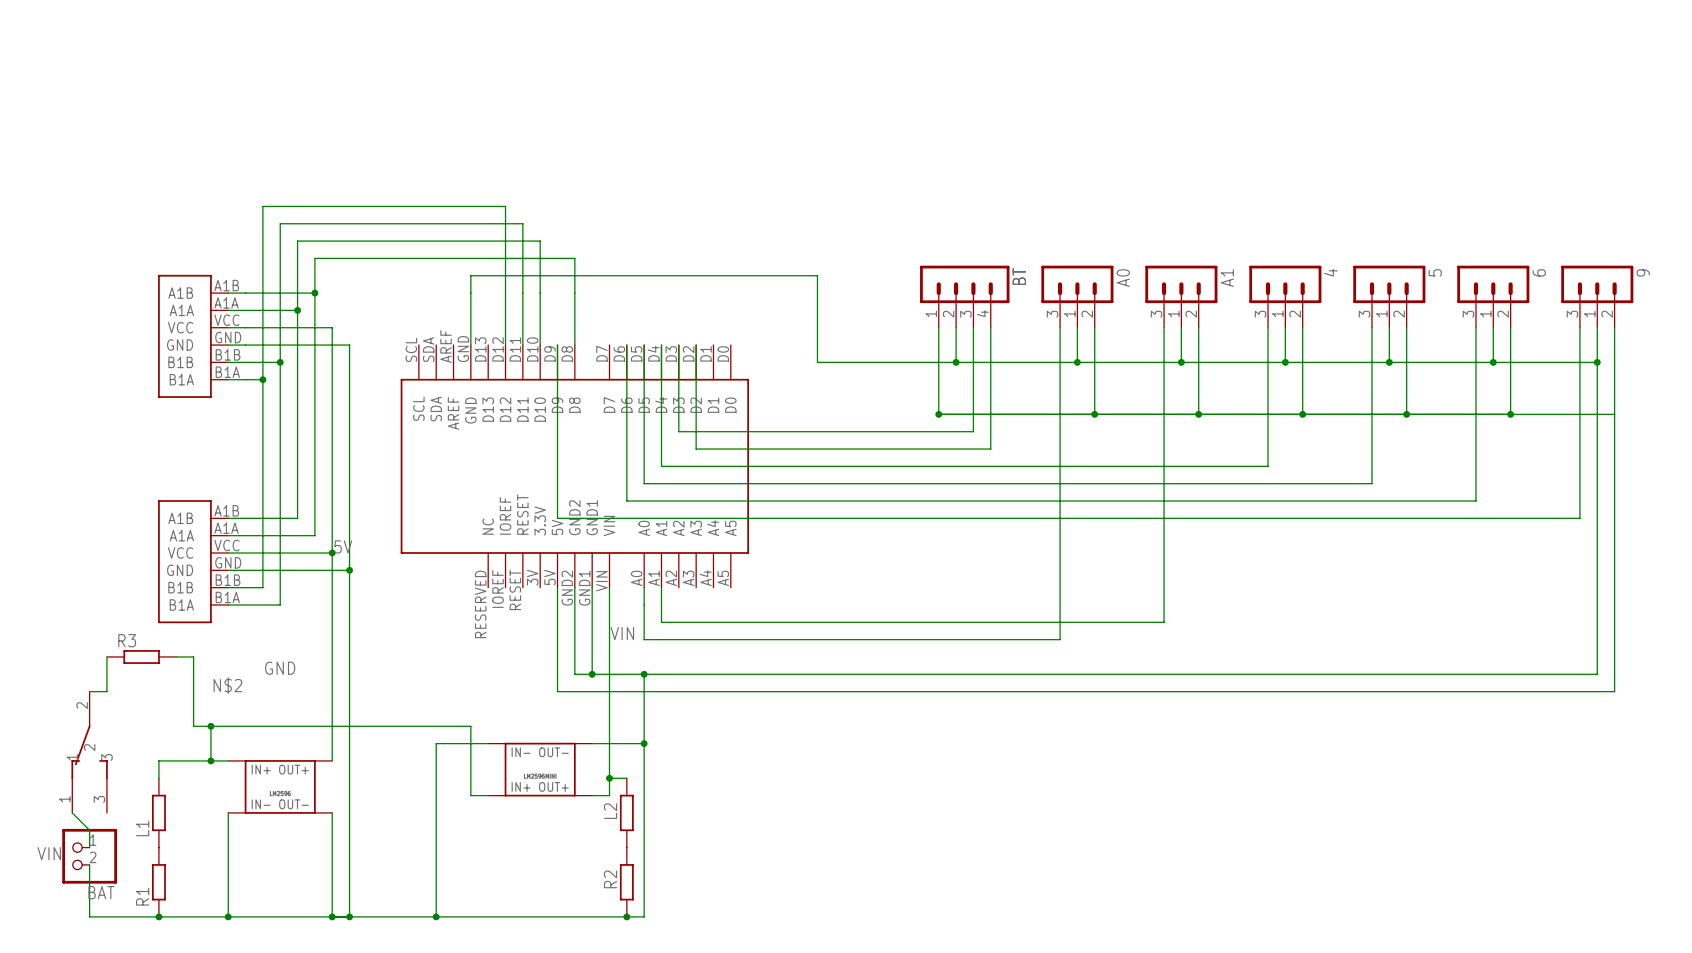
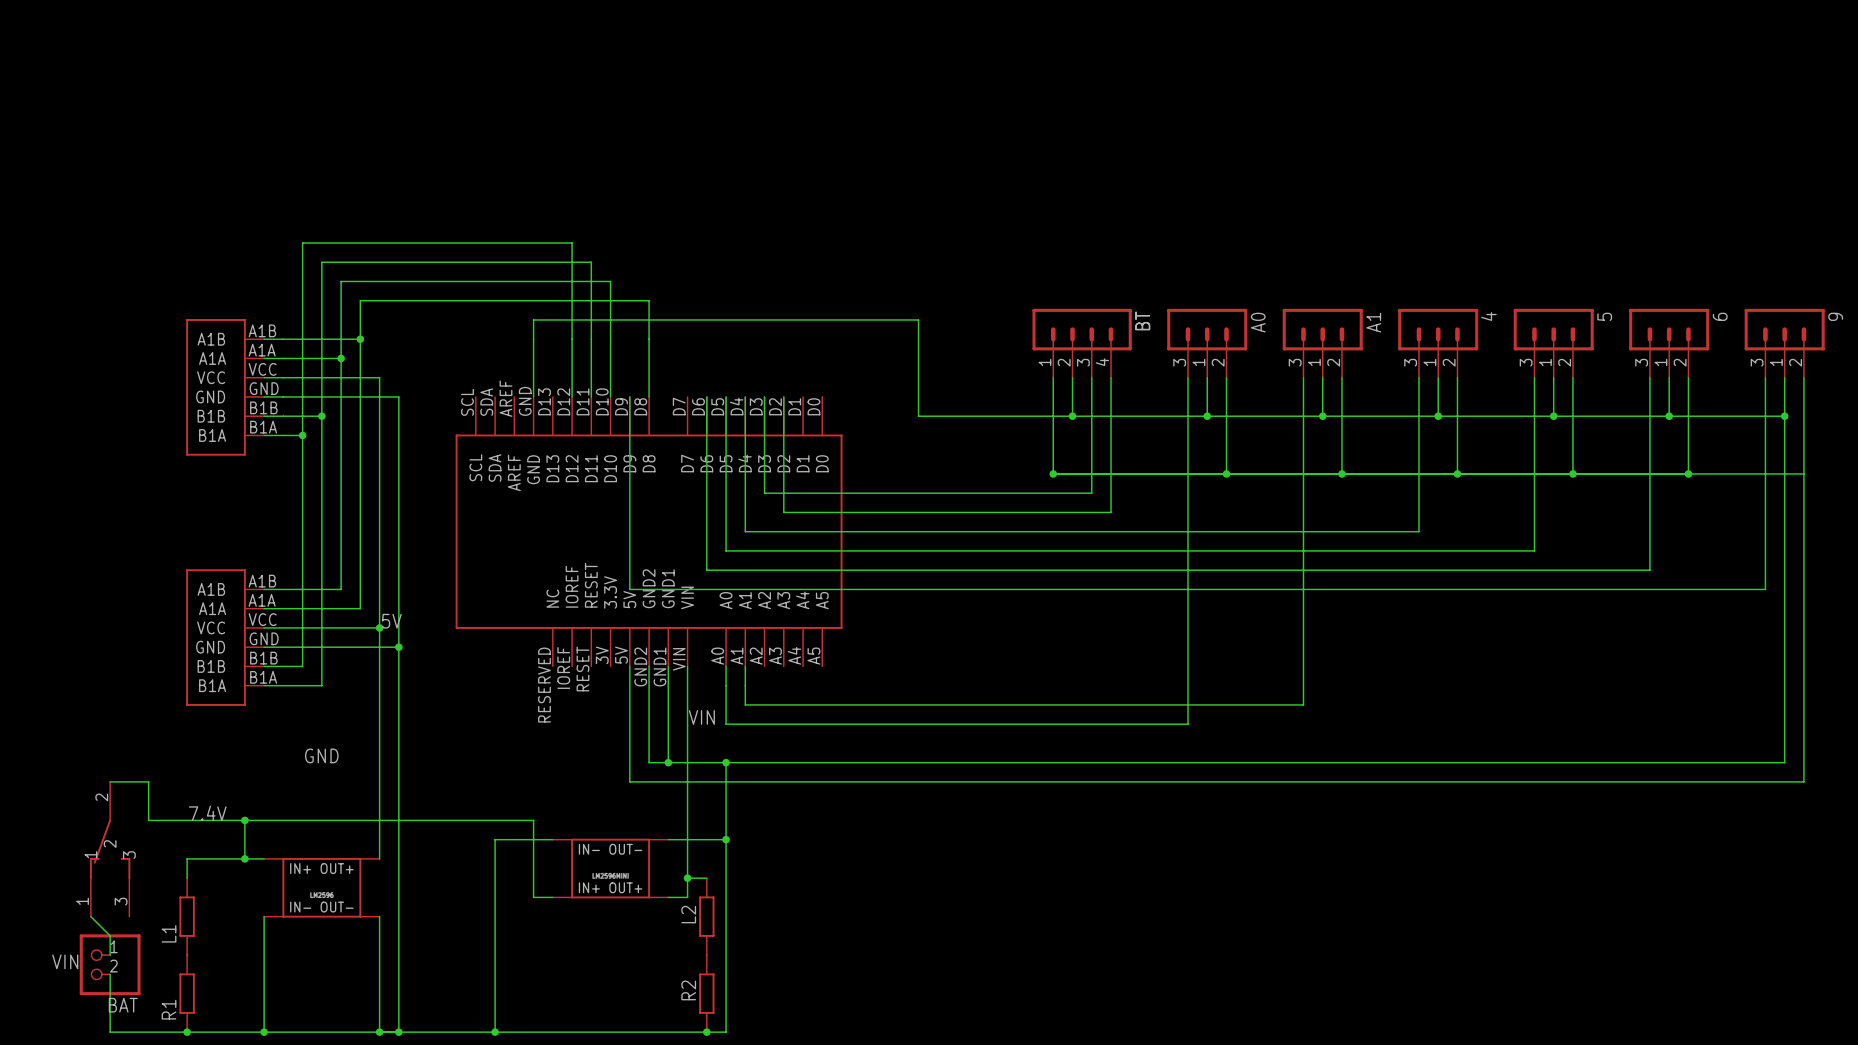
wire: (106, 656) (106, 691) -> none
R3: (141, 656) -> none
wire: (176, 656) (193, 656) (193, 726) -> (129, 781) (148, 781) (148, 820) (225, 820)
label: N$2 (227, 685) -> none
label: none -> 7.4V (207, 813)

